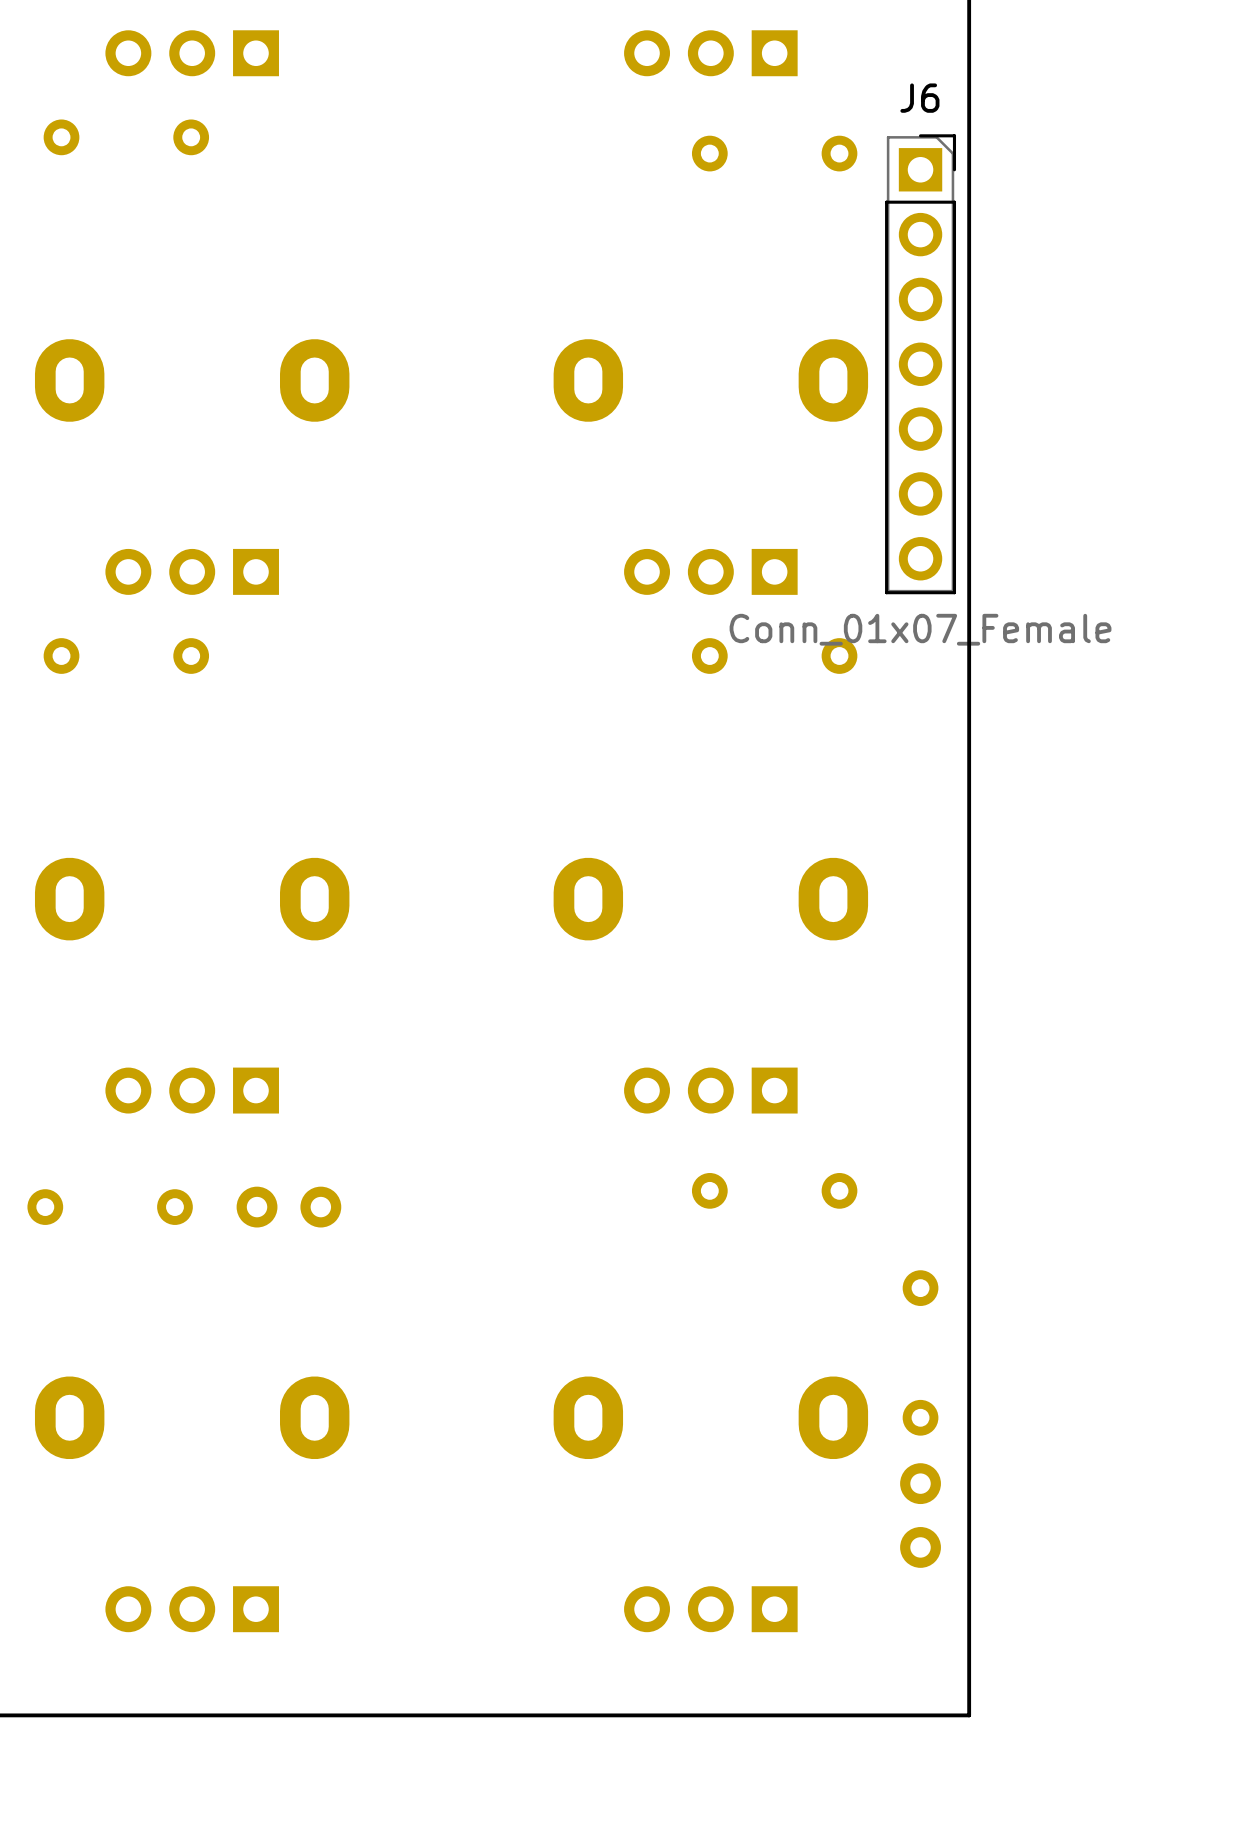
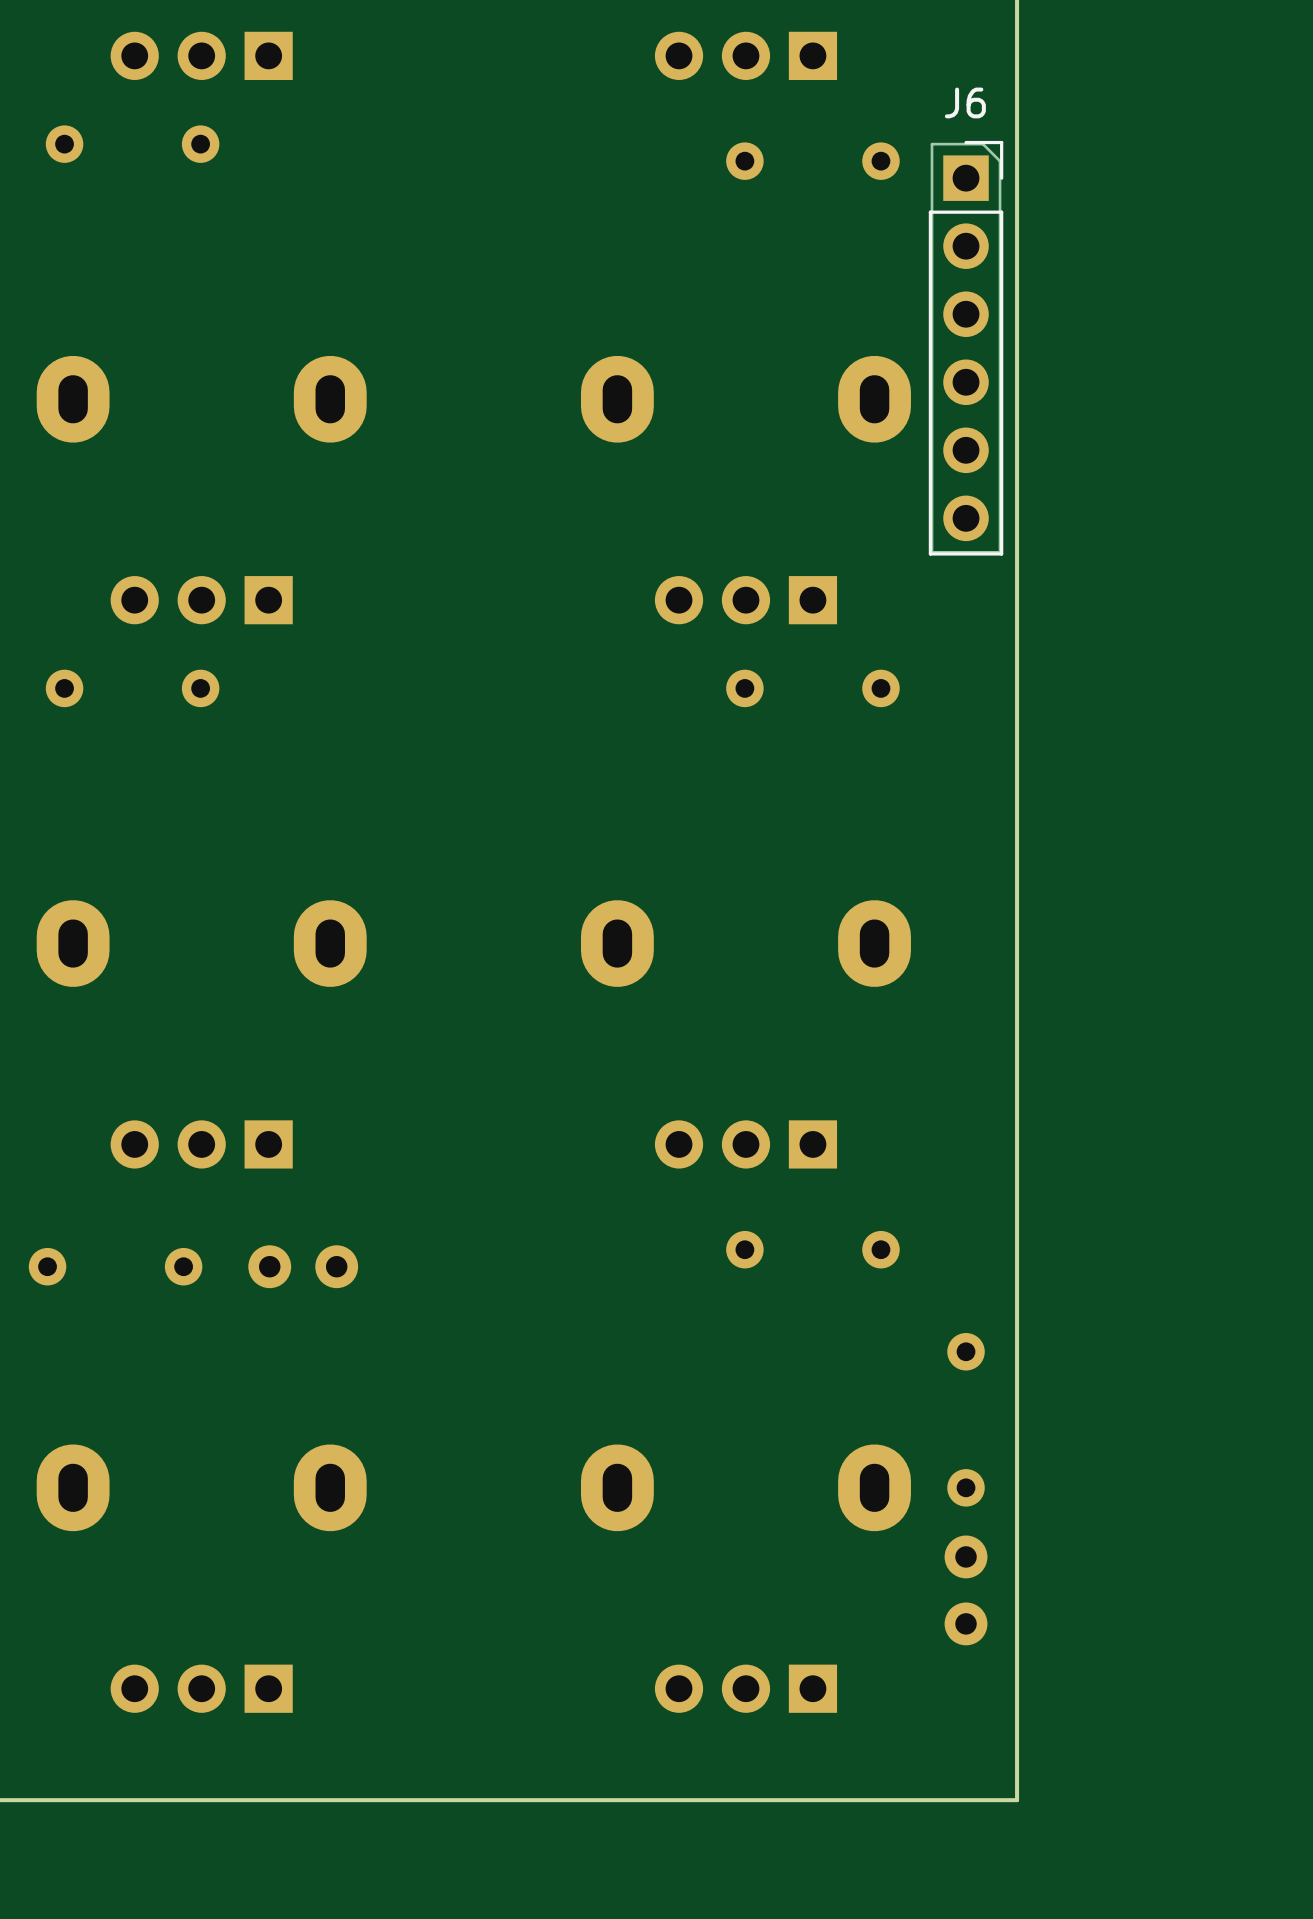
J6 footprint: [885, 134, 957, 595] -> [928, 140, 1004, 556]
J6 value: Conn_01x07_Female (920, 629) -> none

